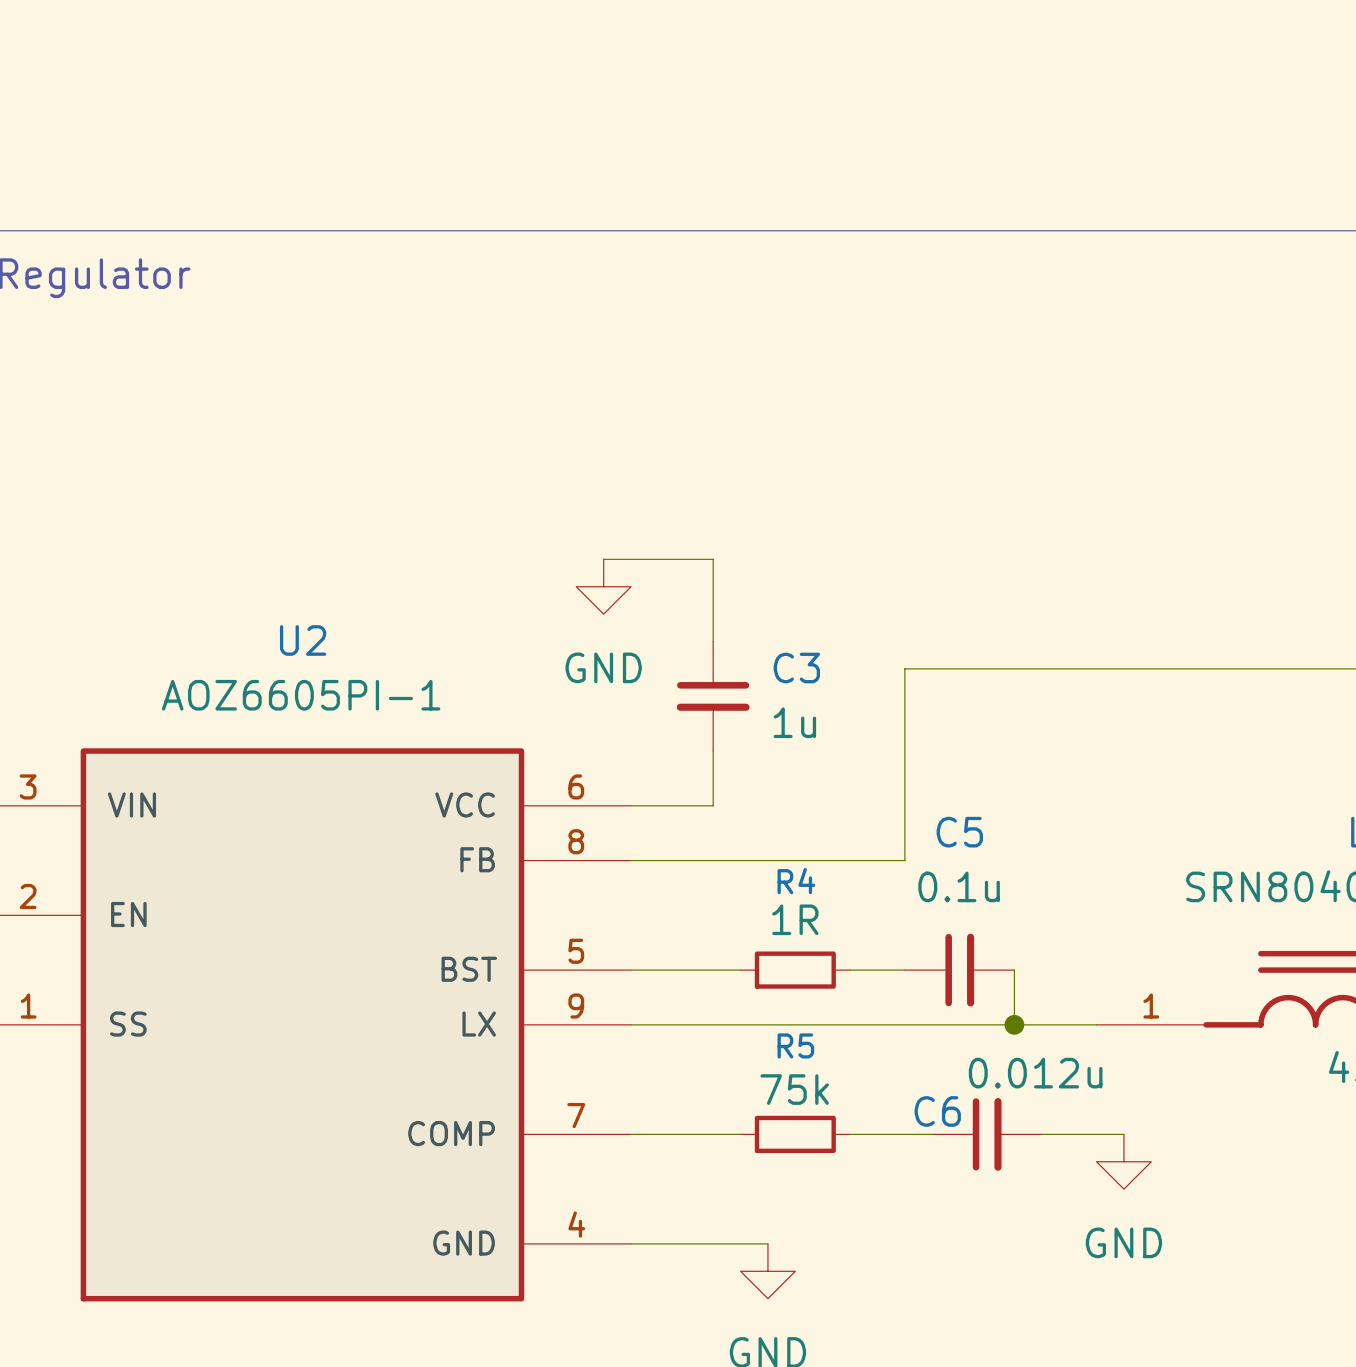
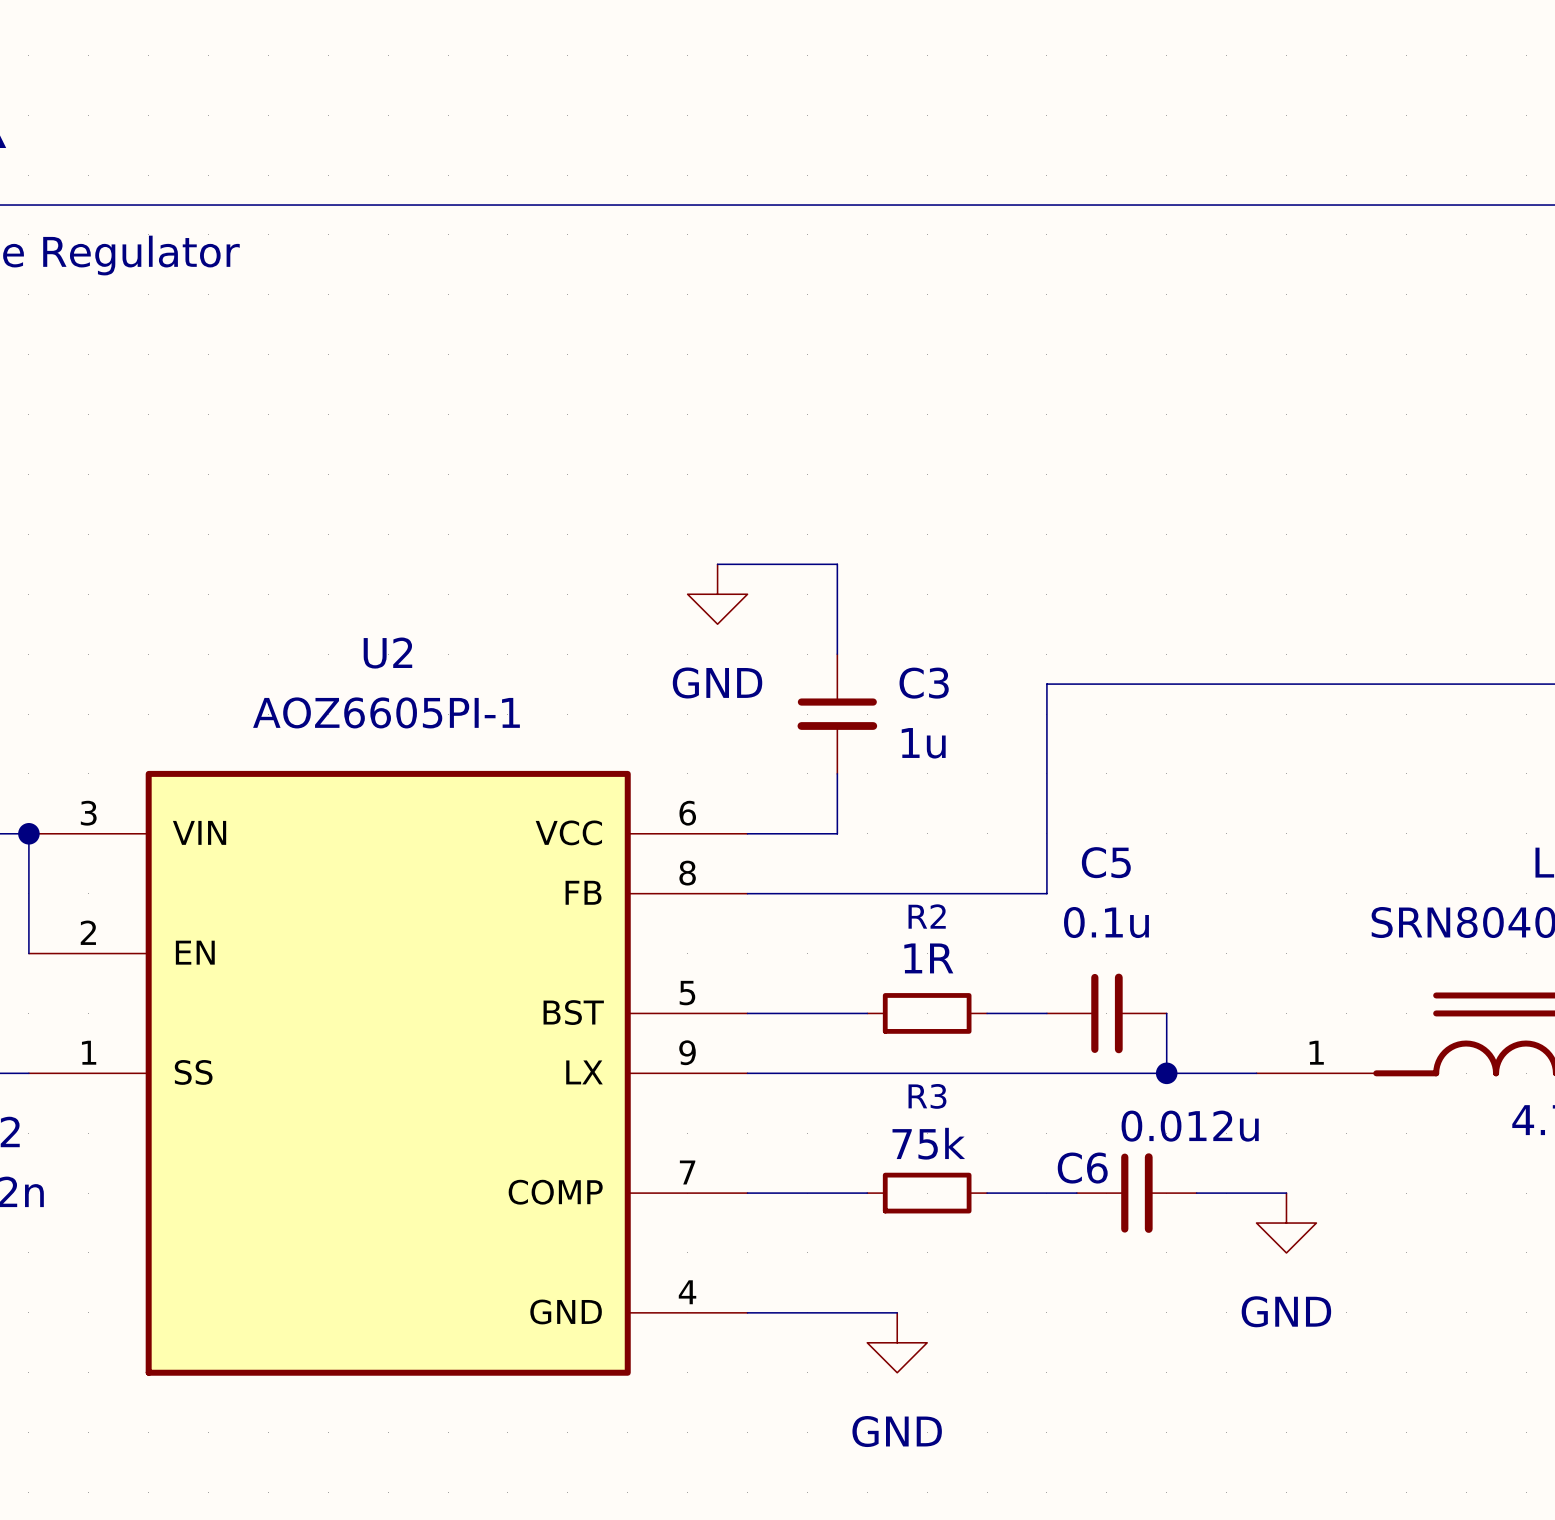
R4 name: R4 (796, 881) -> R2 (927, 916)
R5 name: R5 (795, 1045) -> R3 (927, 1096)

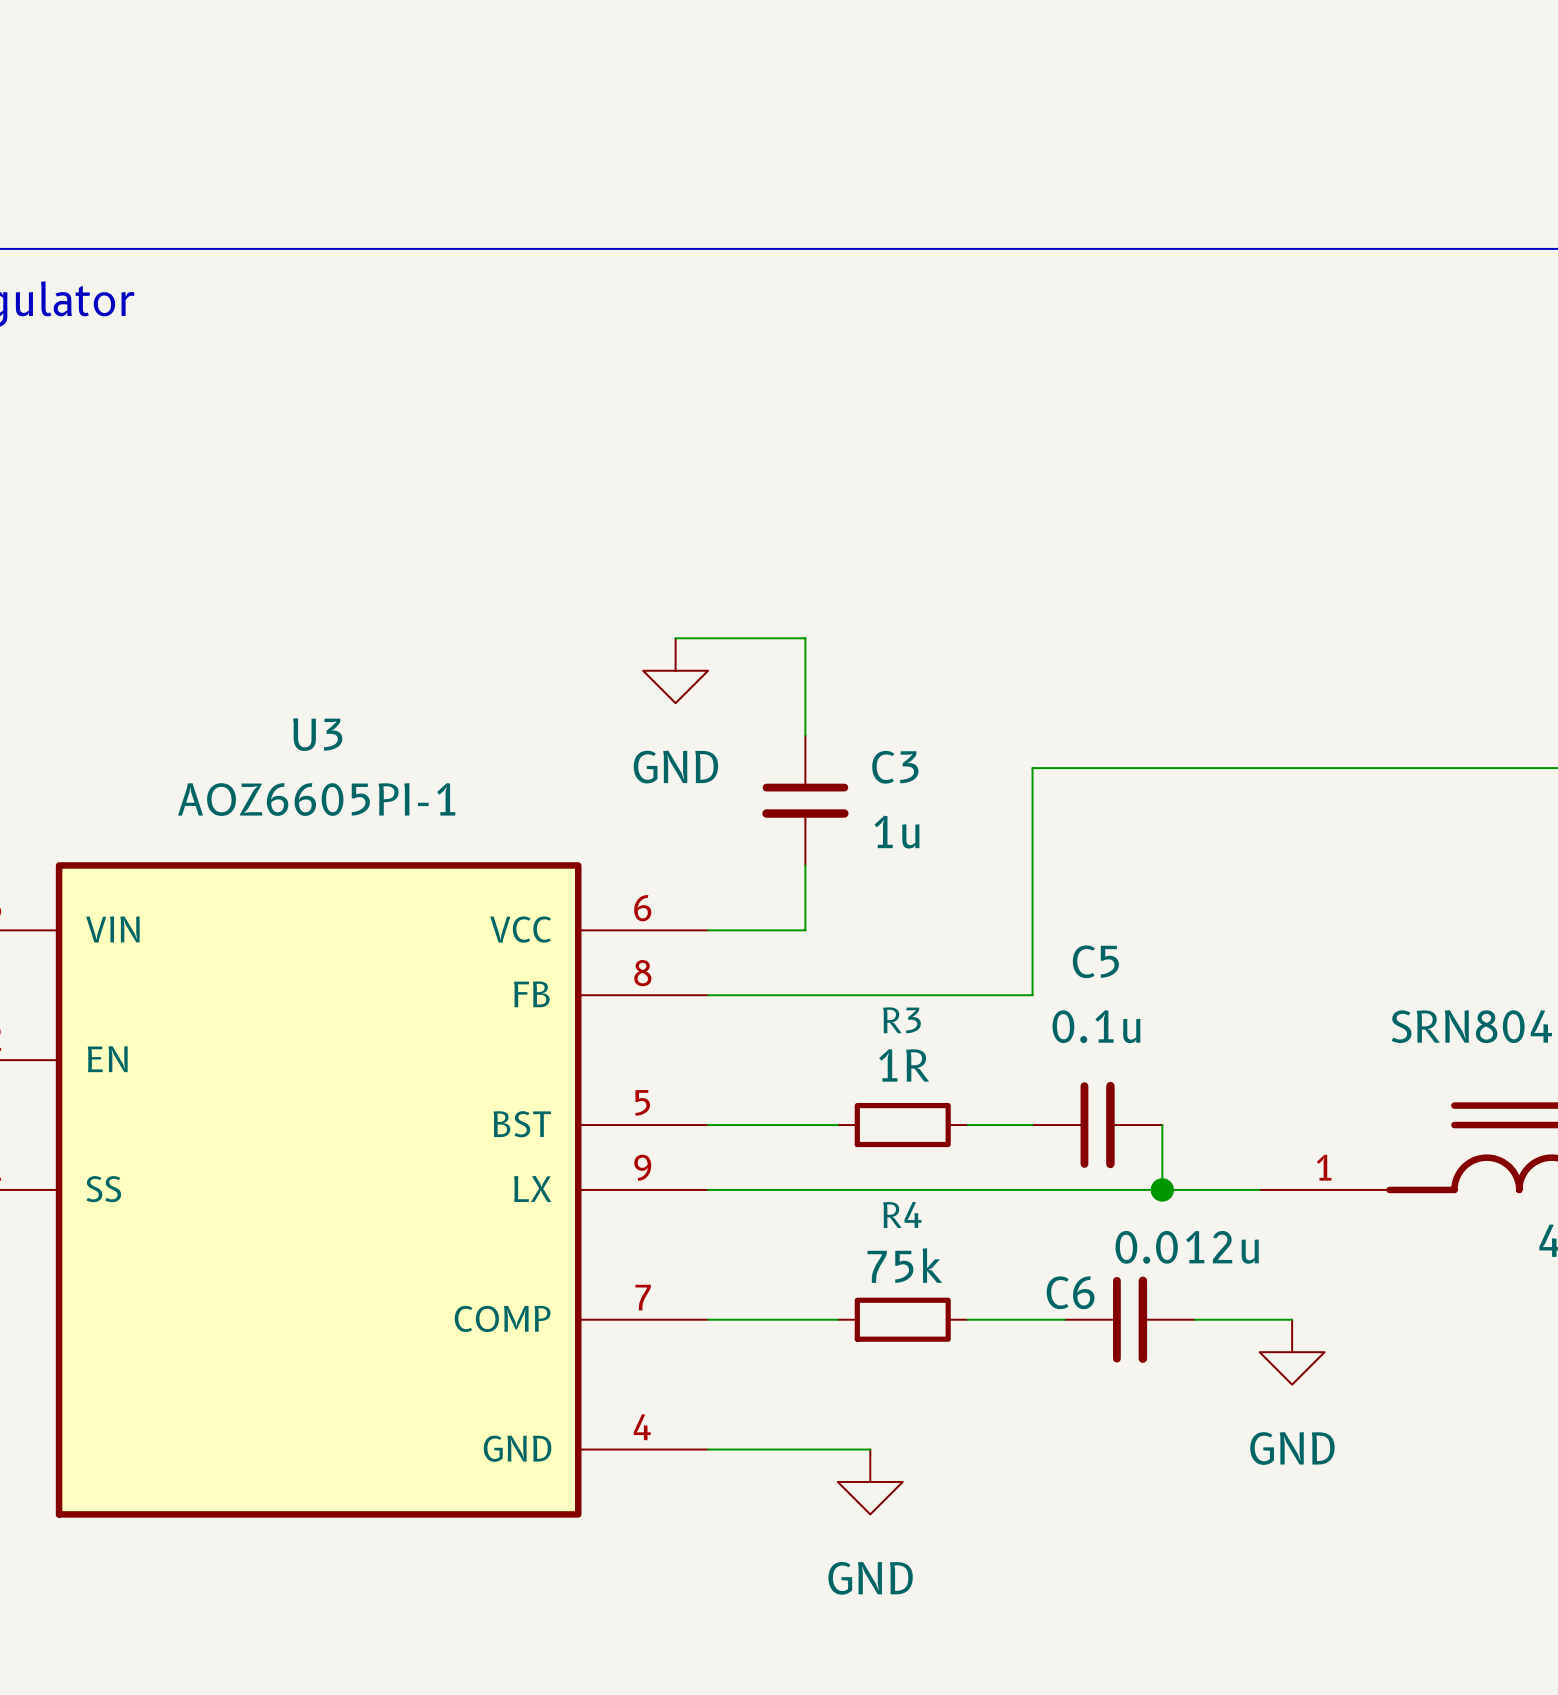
U2 name: U2 (387, 653) -> U3 (317, 734)
R2 name: R2 (927, 916) -> R3 (902, 1020)
R3 name: R3 (927, 1096) -> R4 (902, 1214)

